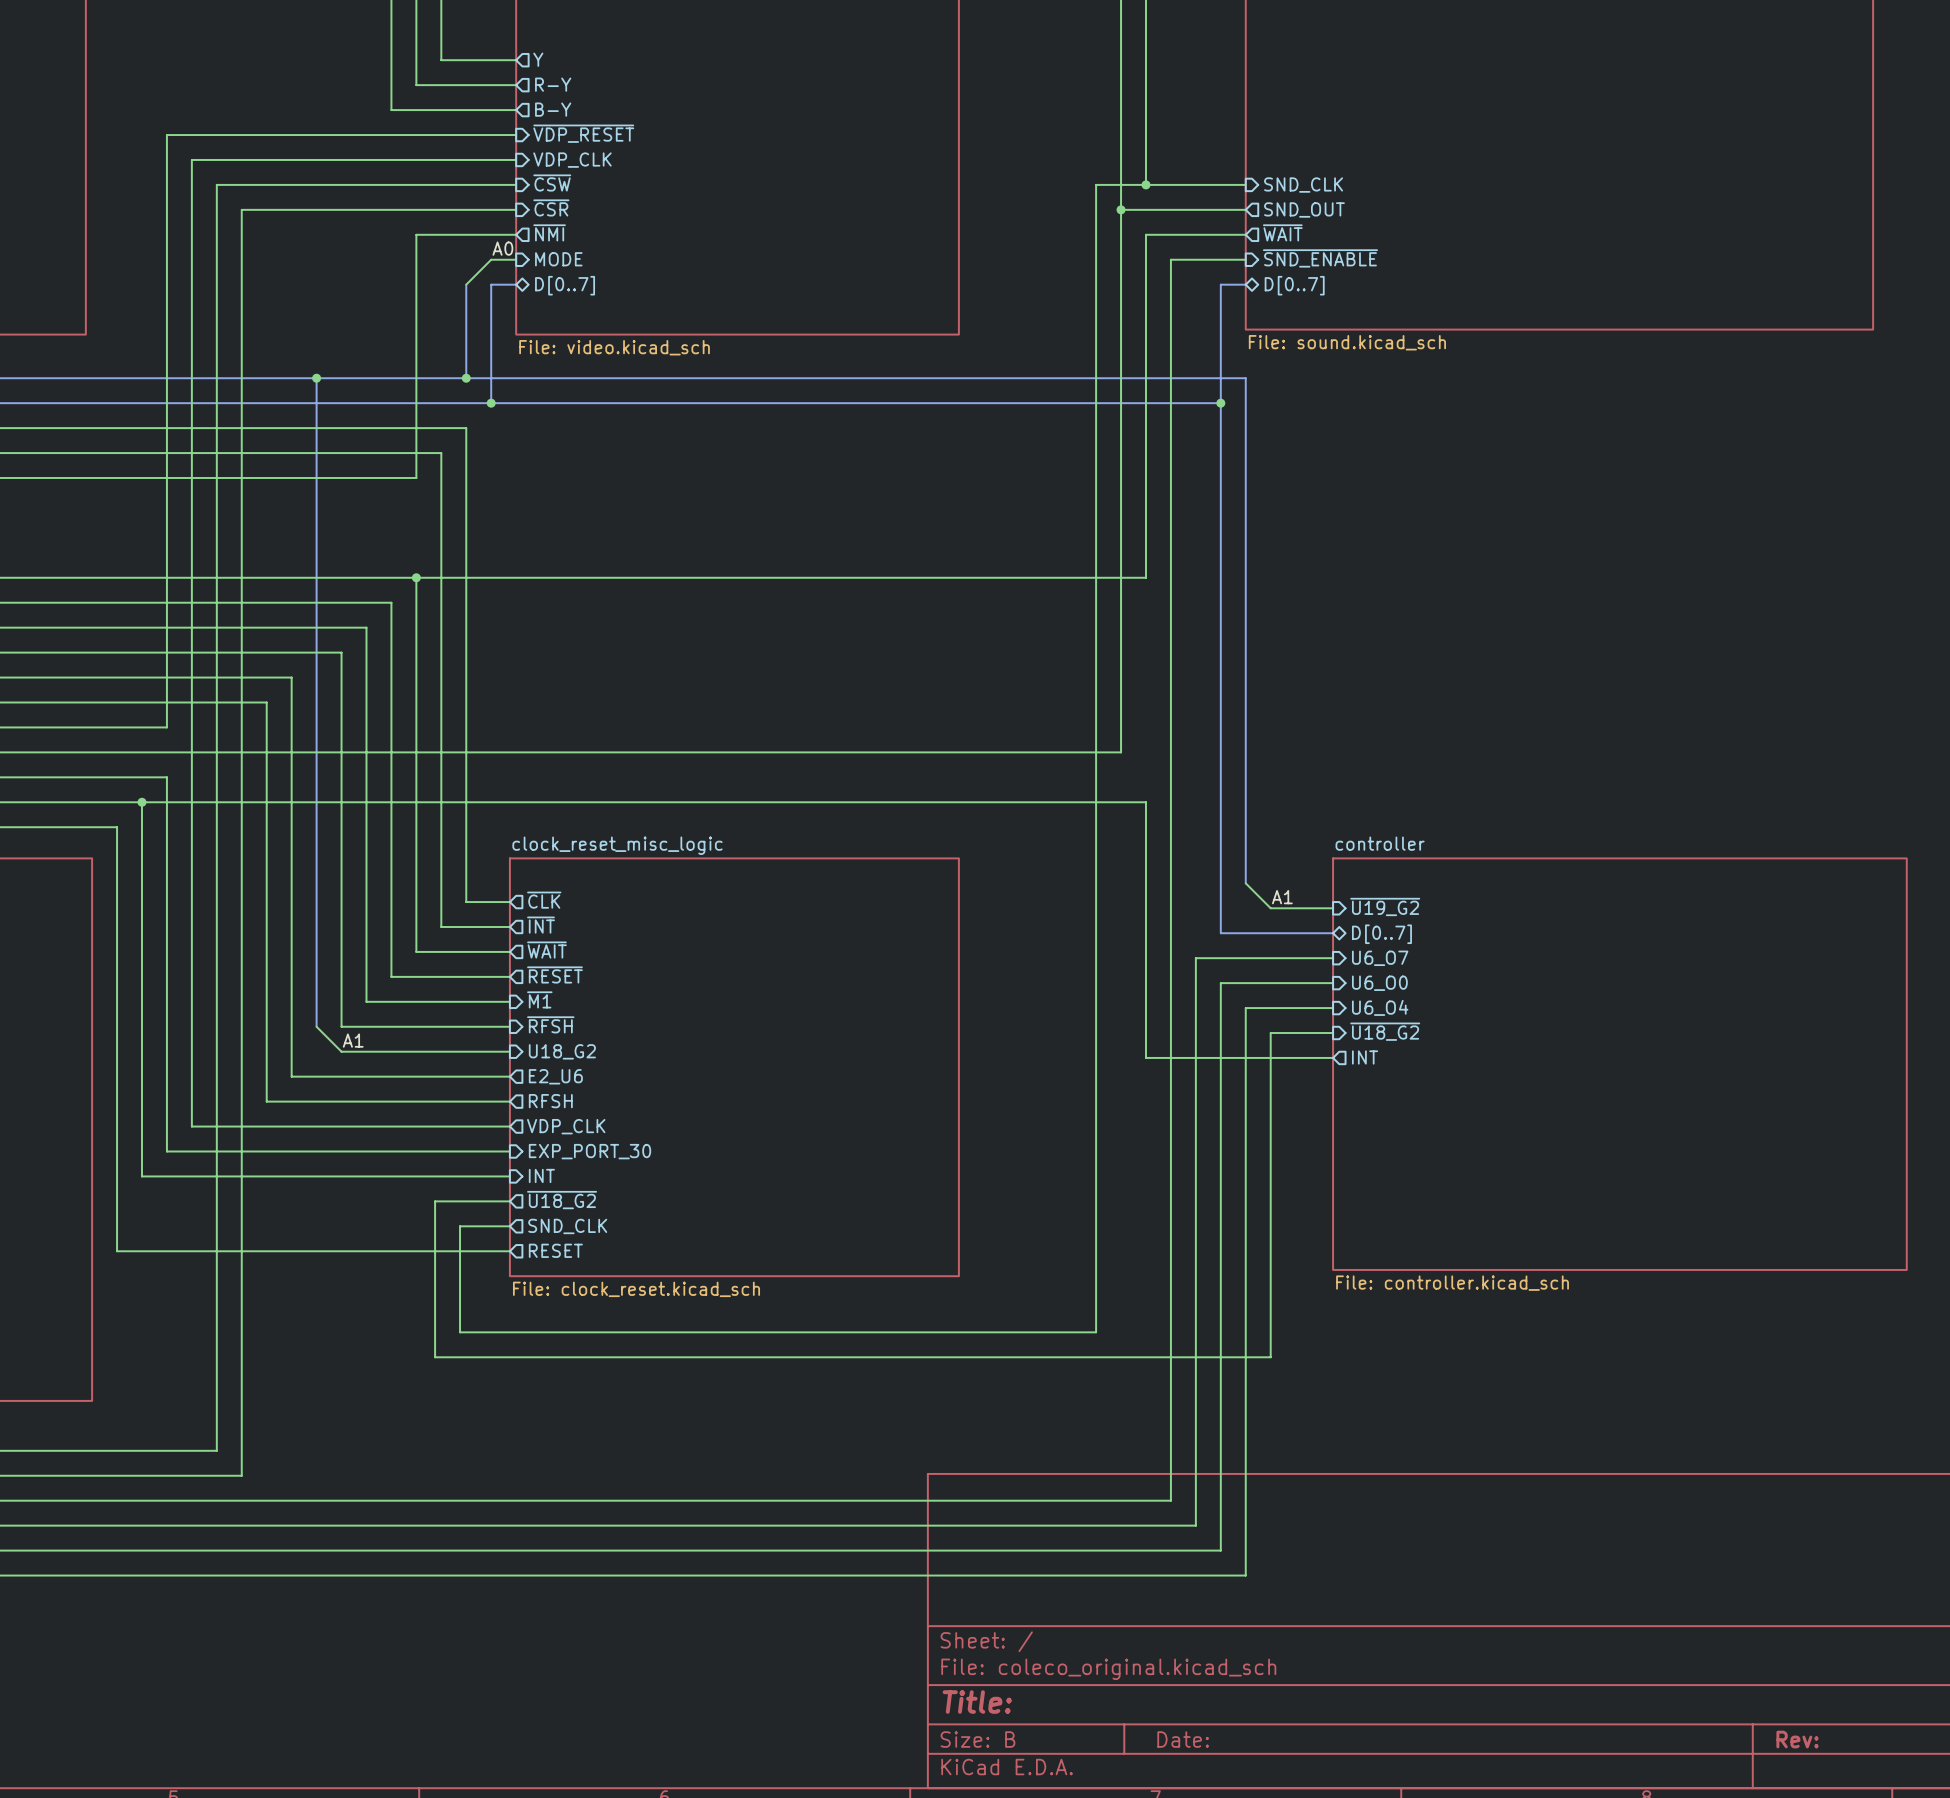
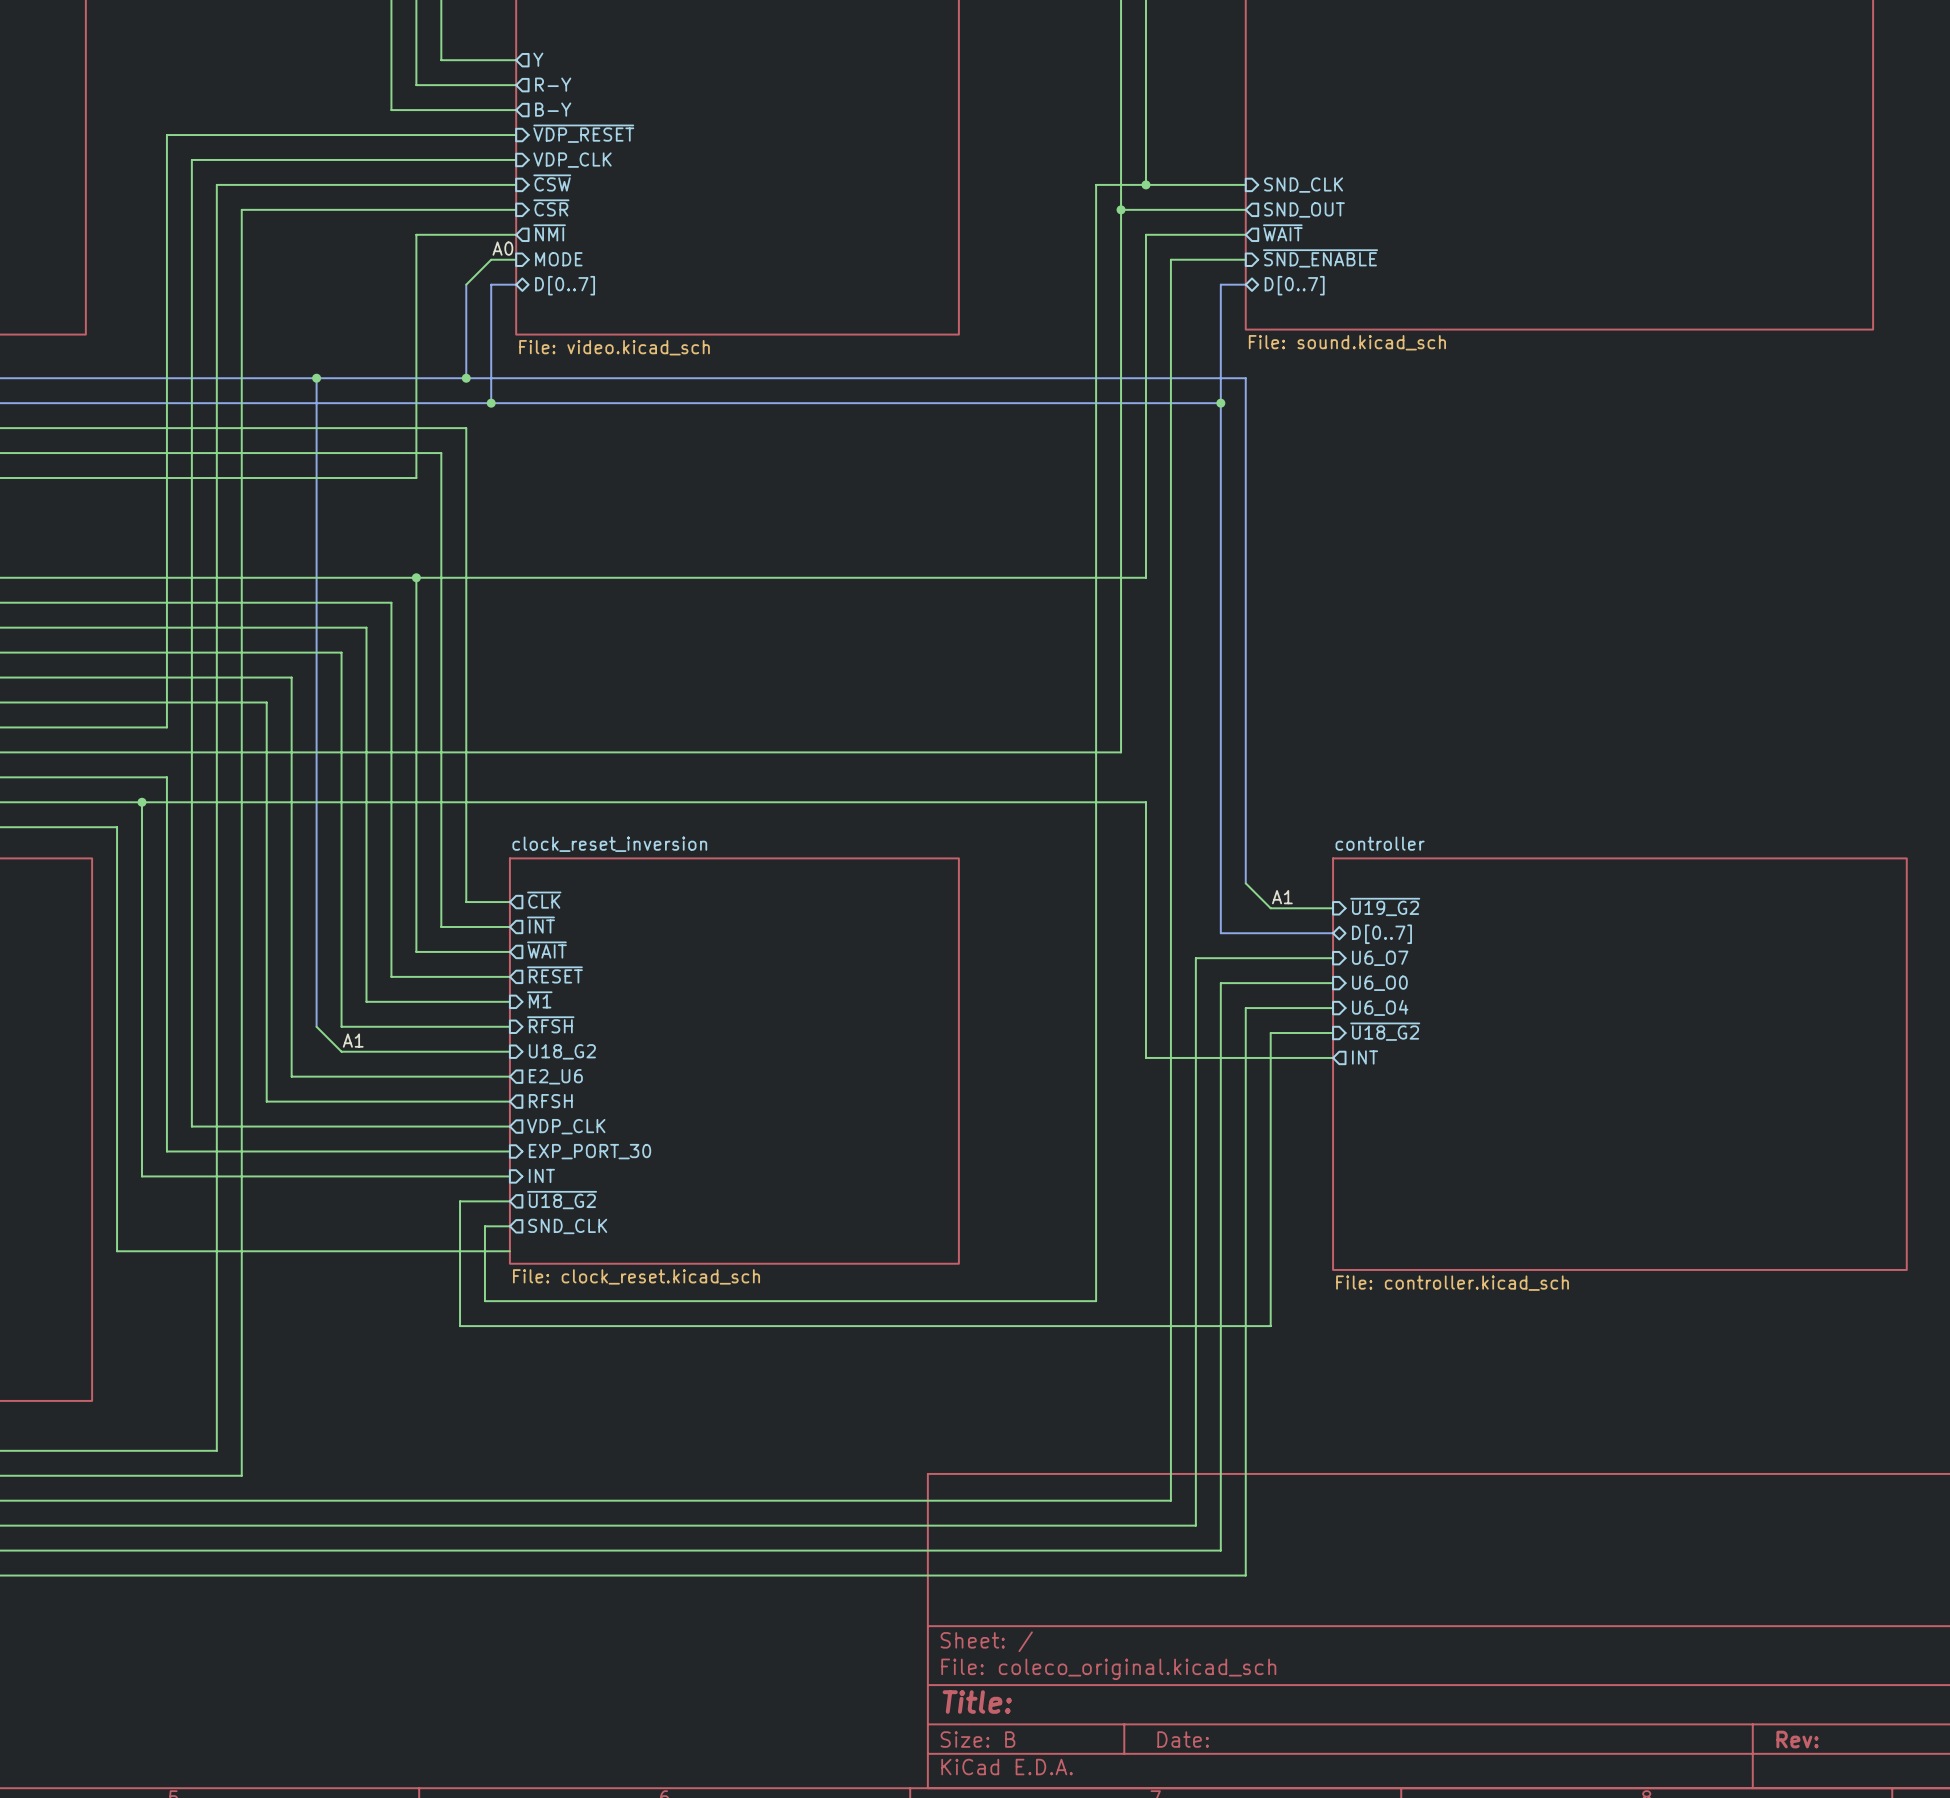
sheet clock_reset_inversion: none -> File: clock_reset.kicad_sch (734, 1061)
sheet clock_reset_misc_logic: File: clock_reset.kicad_sch (734, 1067) -> none
wire: (460, 1201) (435, 1201) (435, 1357) (1270, 1357) (1270, 1326) -> (460, 1326) (1270, 1326)
wire: (460, 1226) (484, 1226) -> (460, 1226) (460, 1201)
sheet pin: RESET (555, 1250) -> none
wire: (1096, 1301) (1096, 1332) (460, 1332) (460, 1326) -> (1096, 1301) (484, 1301) (484, 1226)

